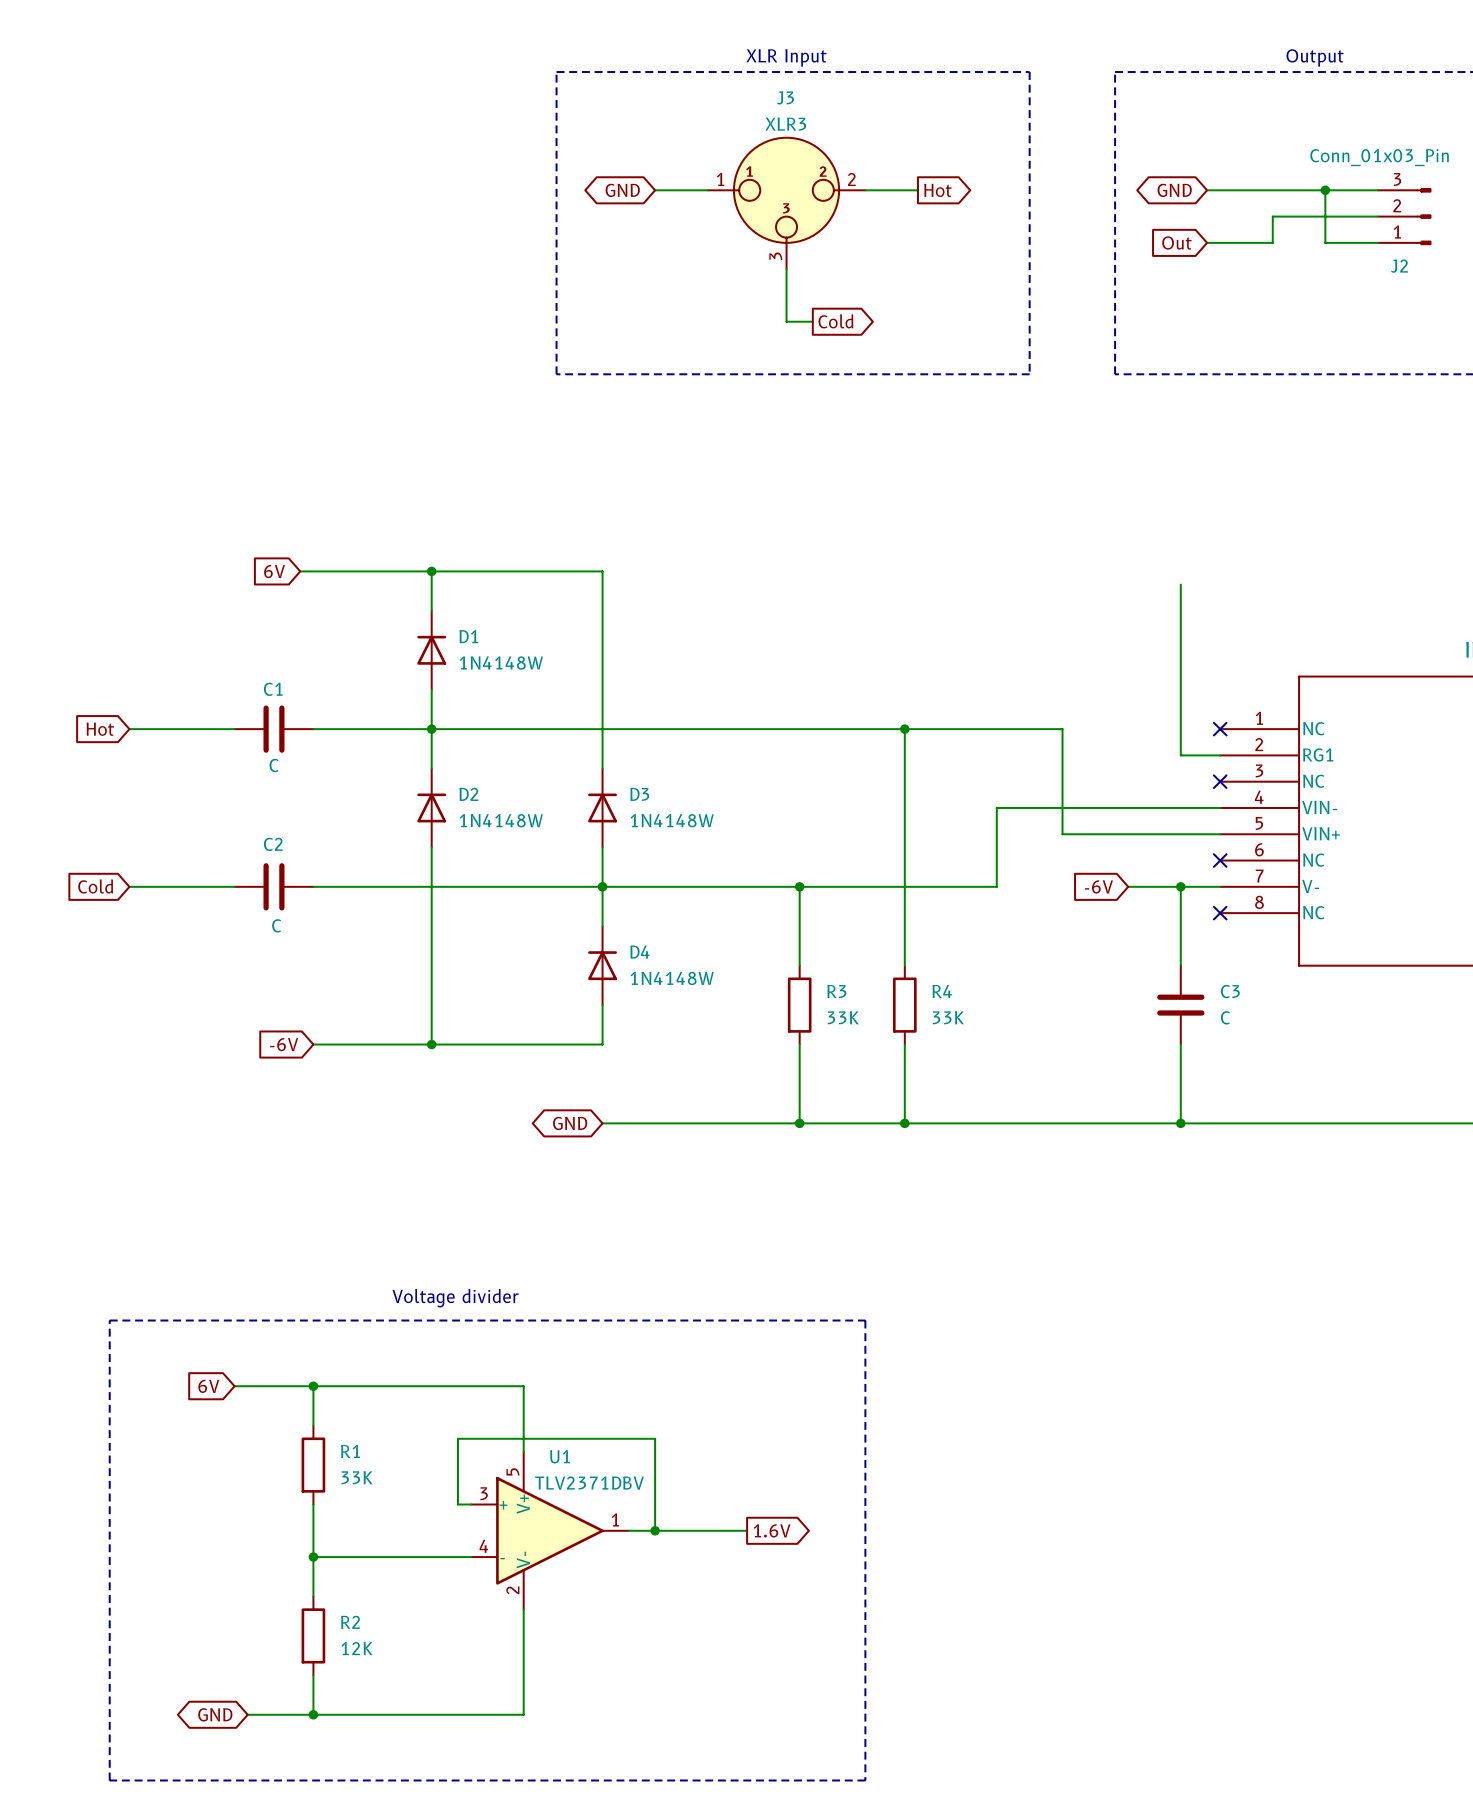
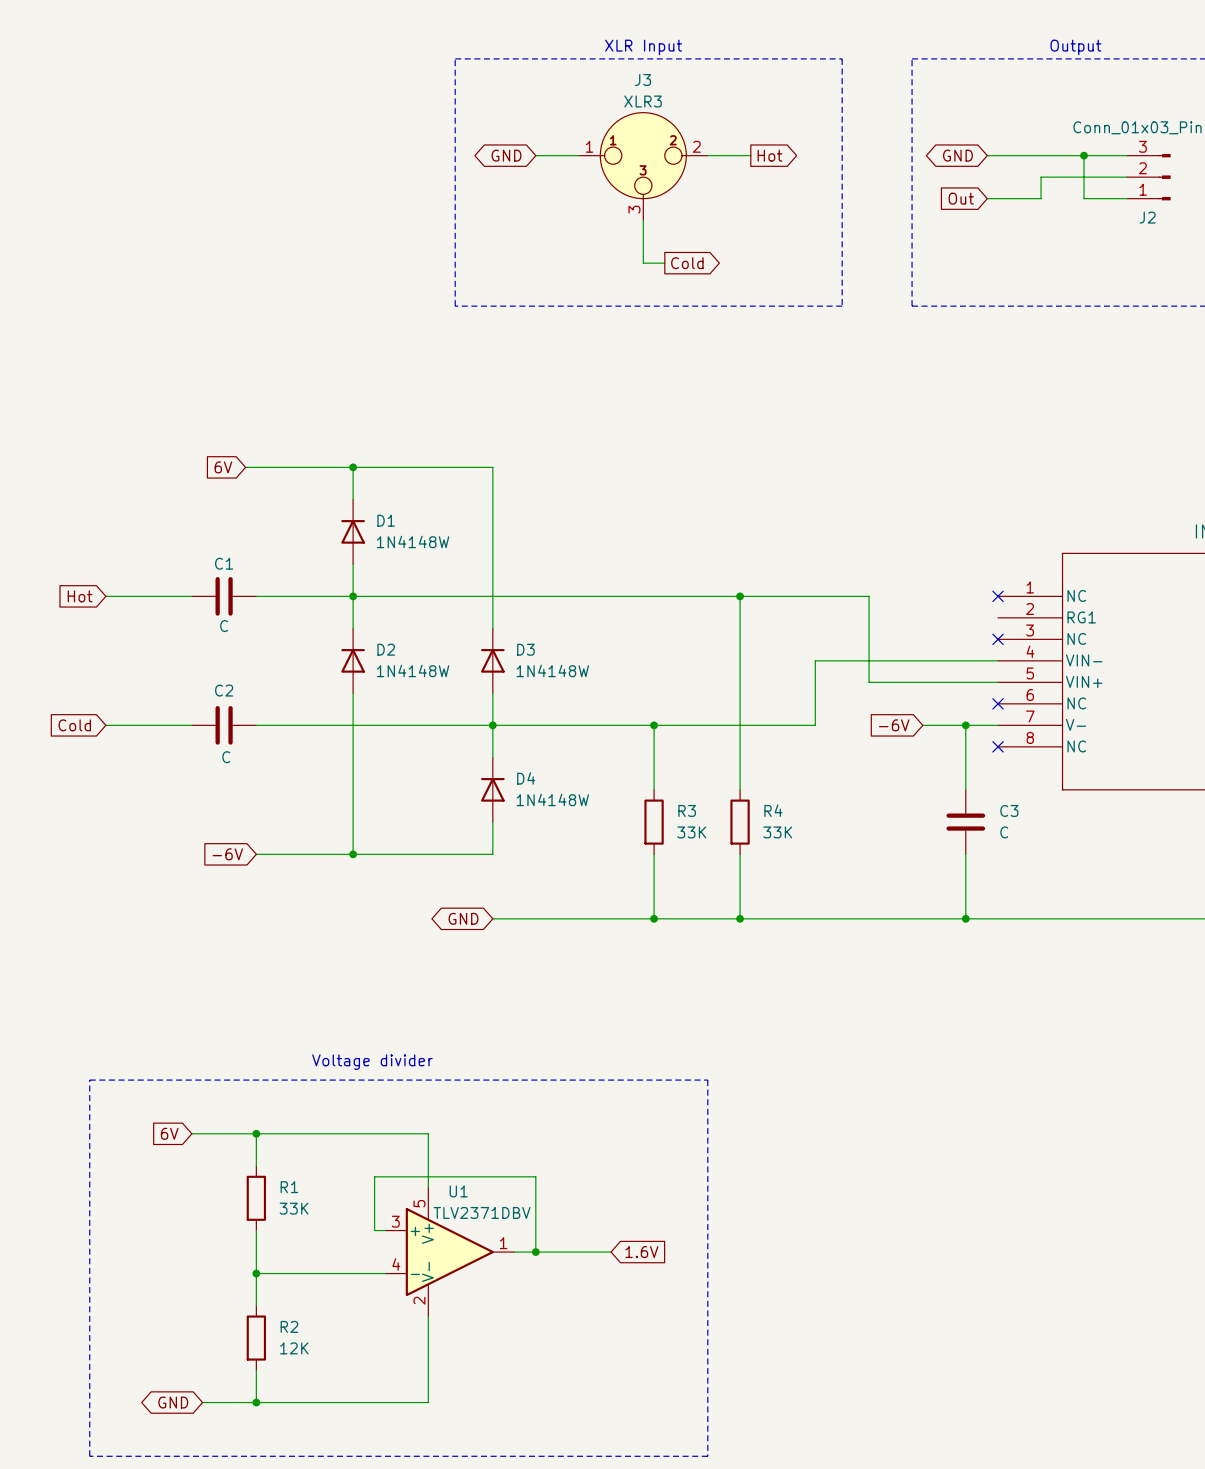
wire: (1180, 584) (1180, 755) (1220, 755) -> none
global label shape: output (772, 1530) -> input (641, 1252)

